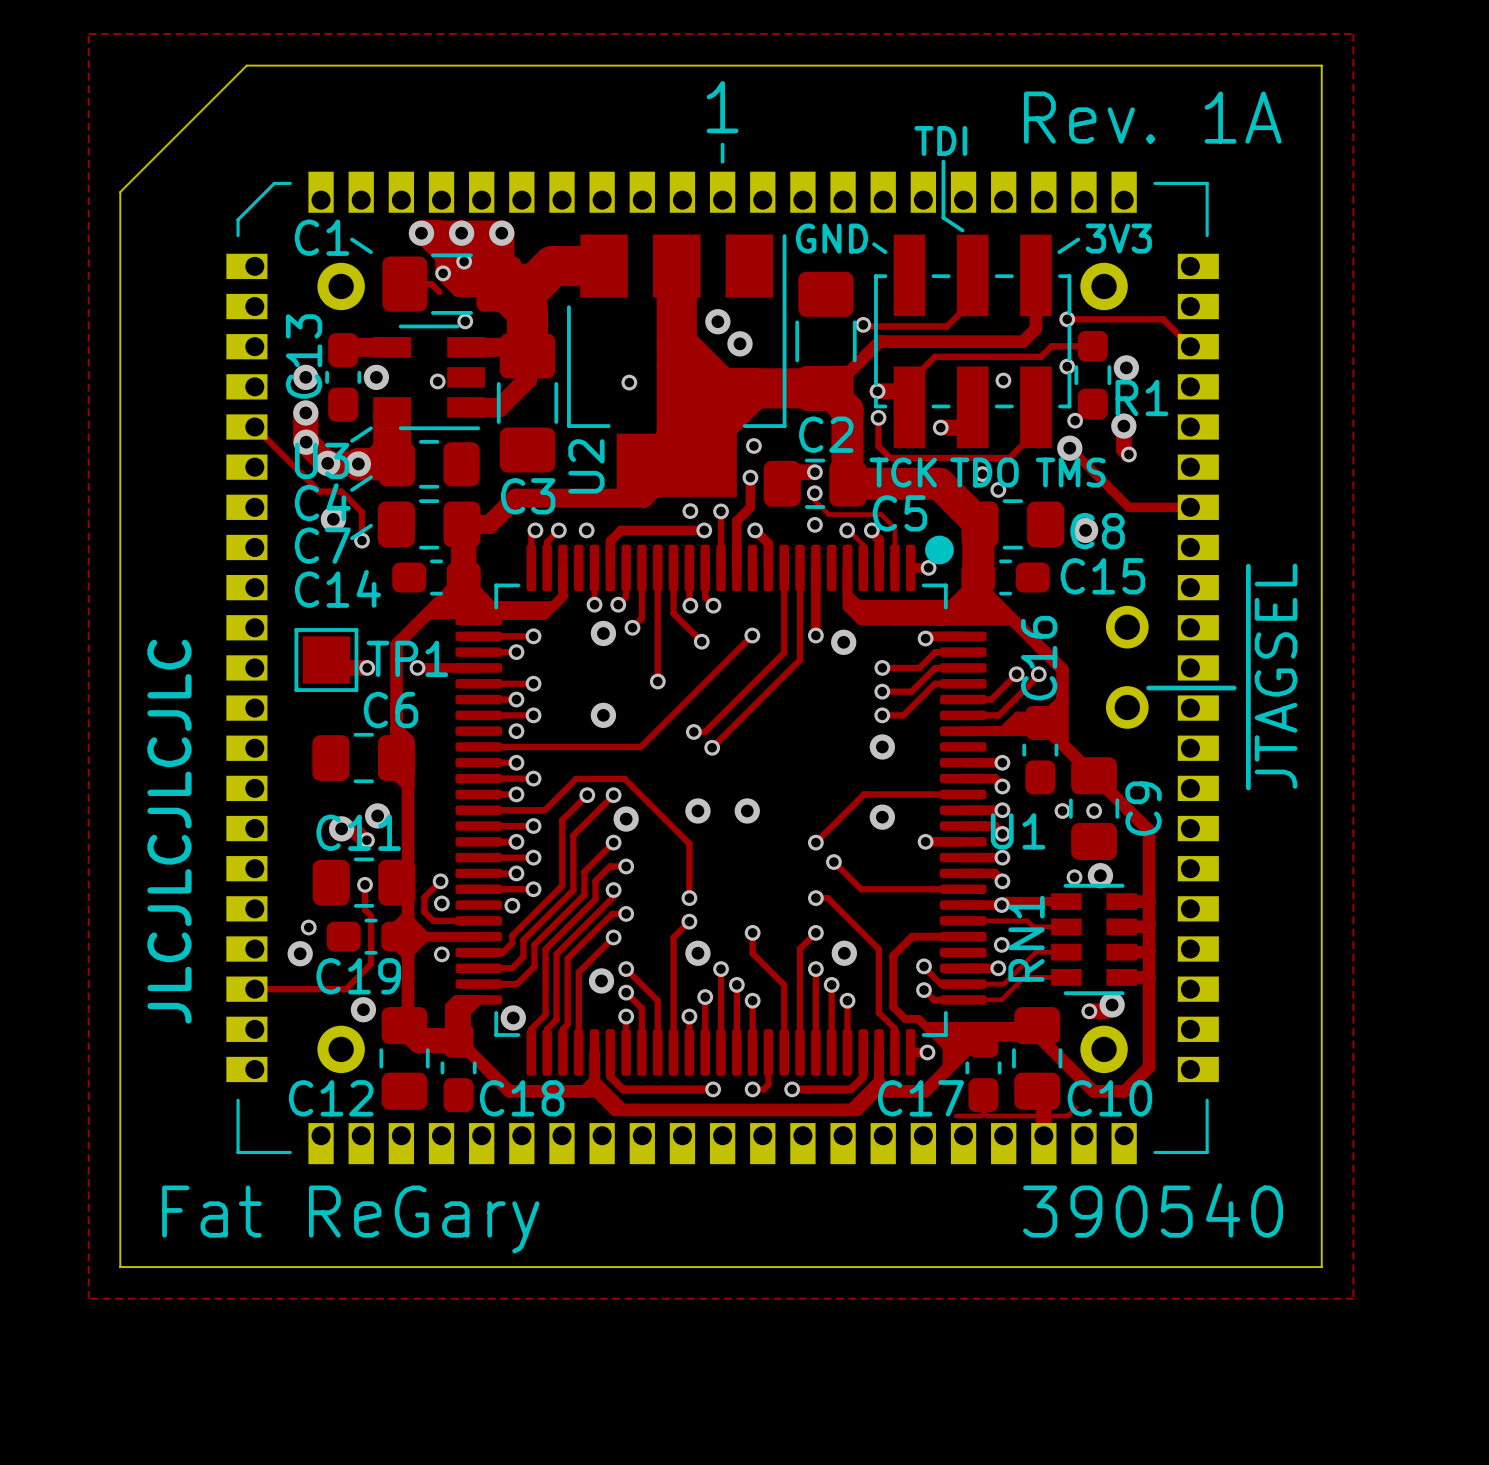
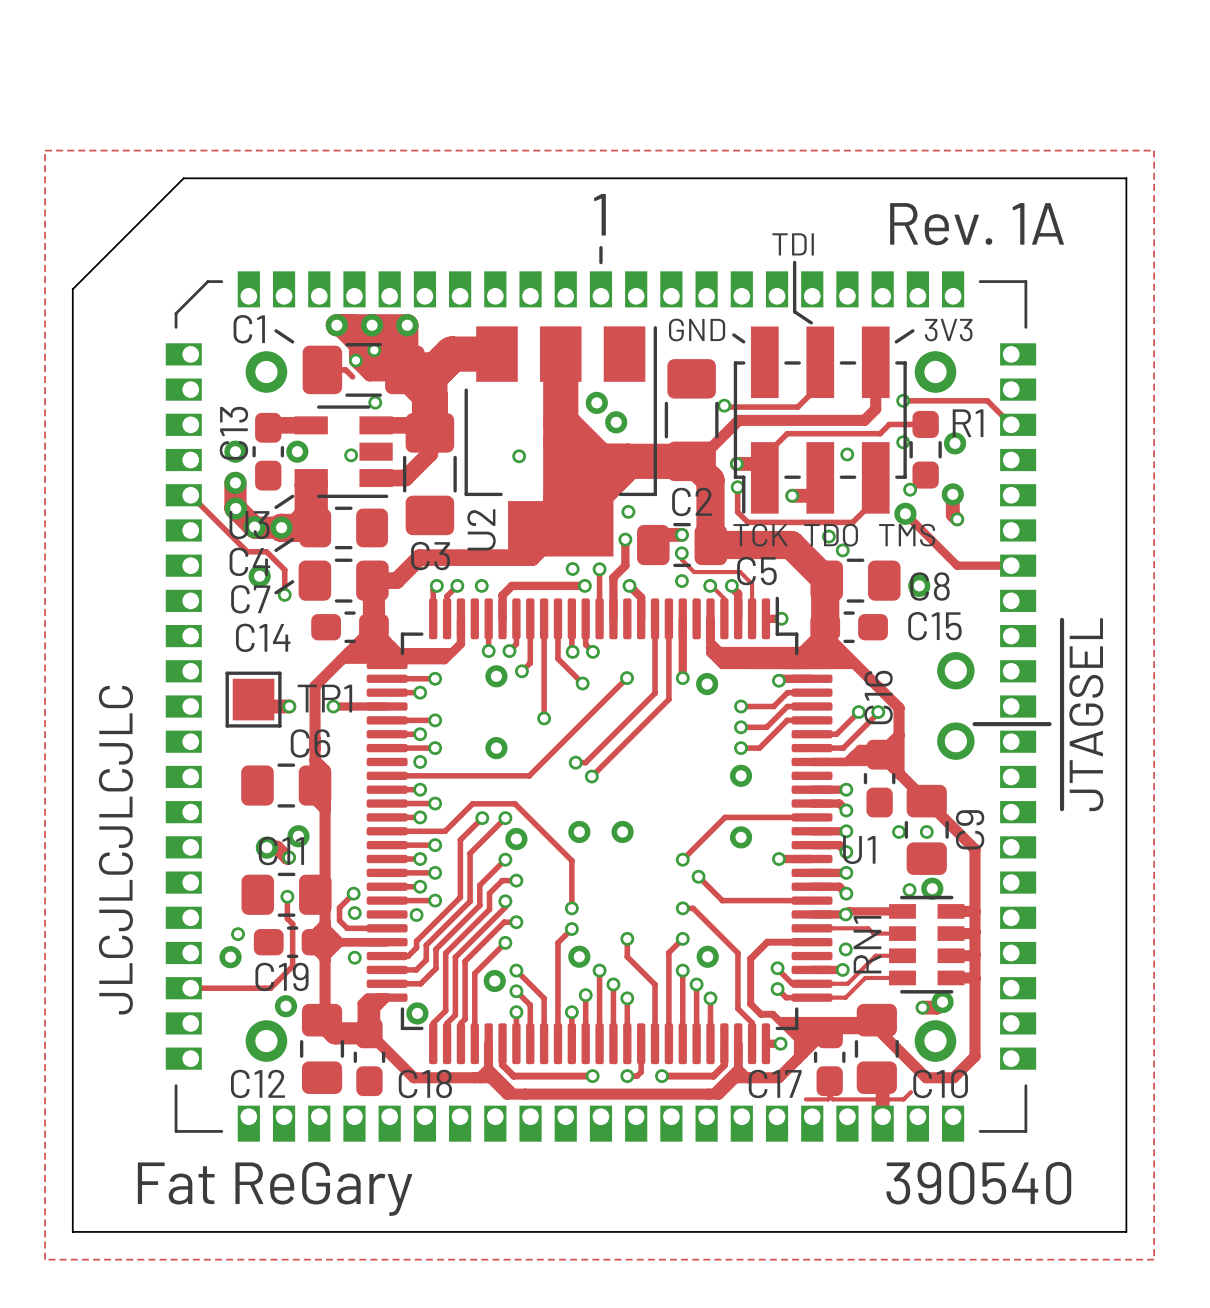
part footprint: [874, 234, 1072, 449] -> [733, 326, 907, 514]
R1 name position: R1 (1141, 398) -> R1 (968, 423)
U1 footprint: [455, 535, 987, 1076] -> [366, 596, 833, 1065]

